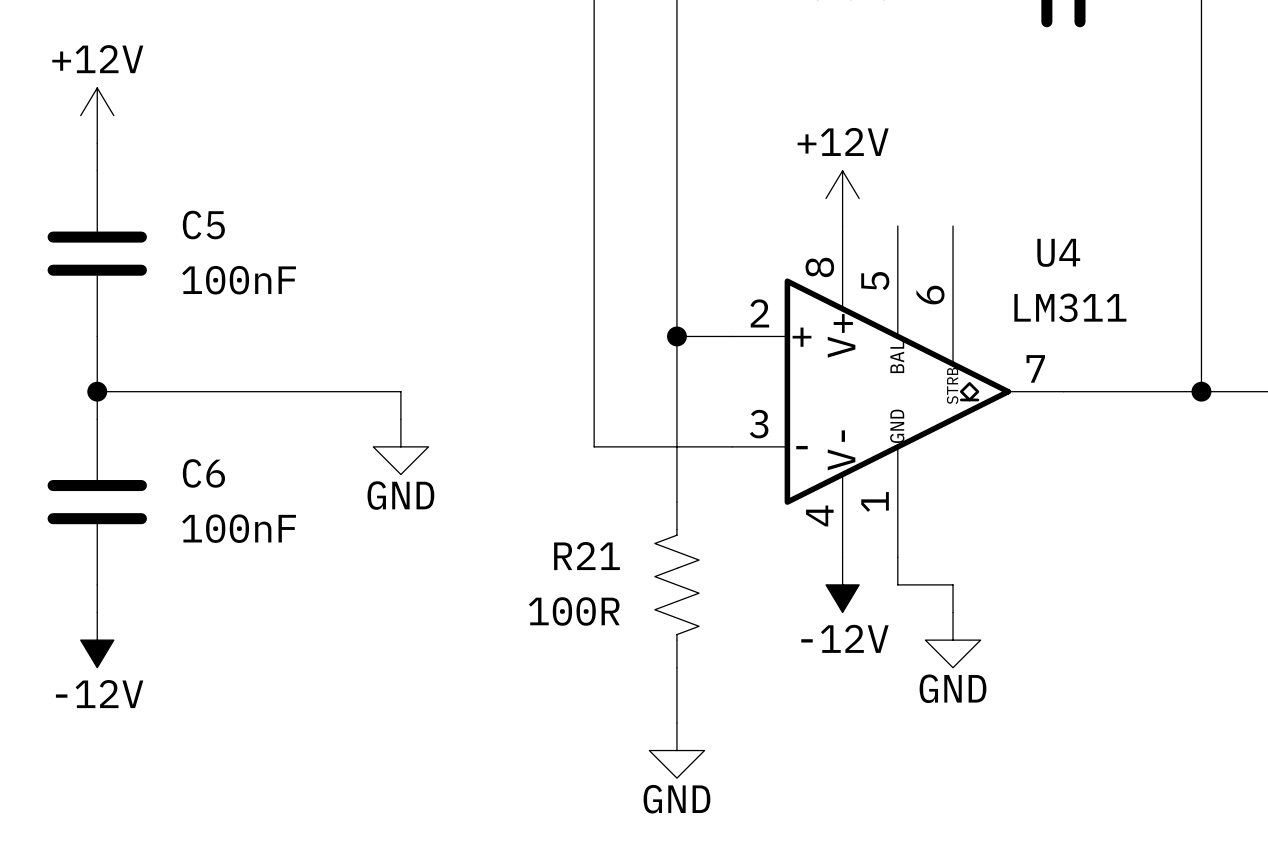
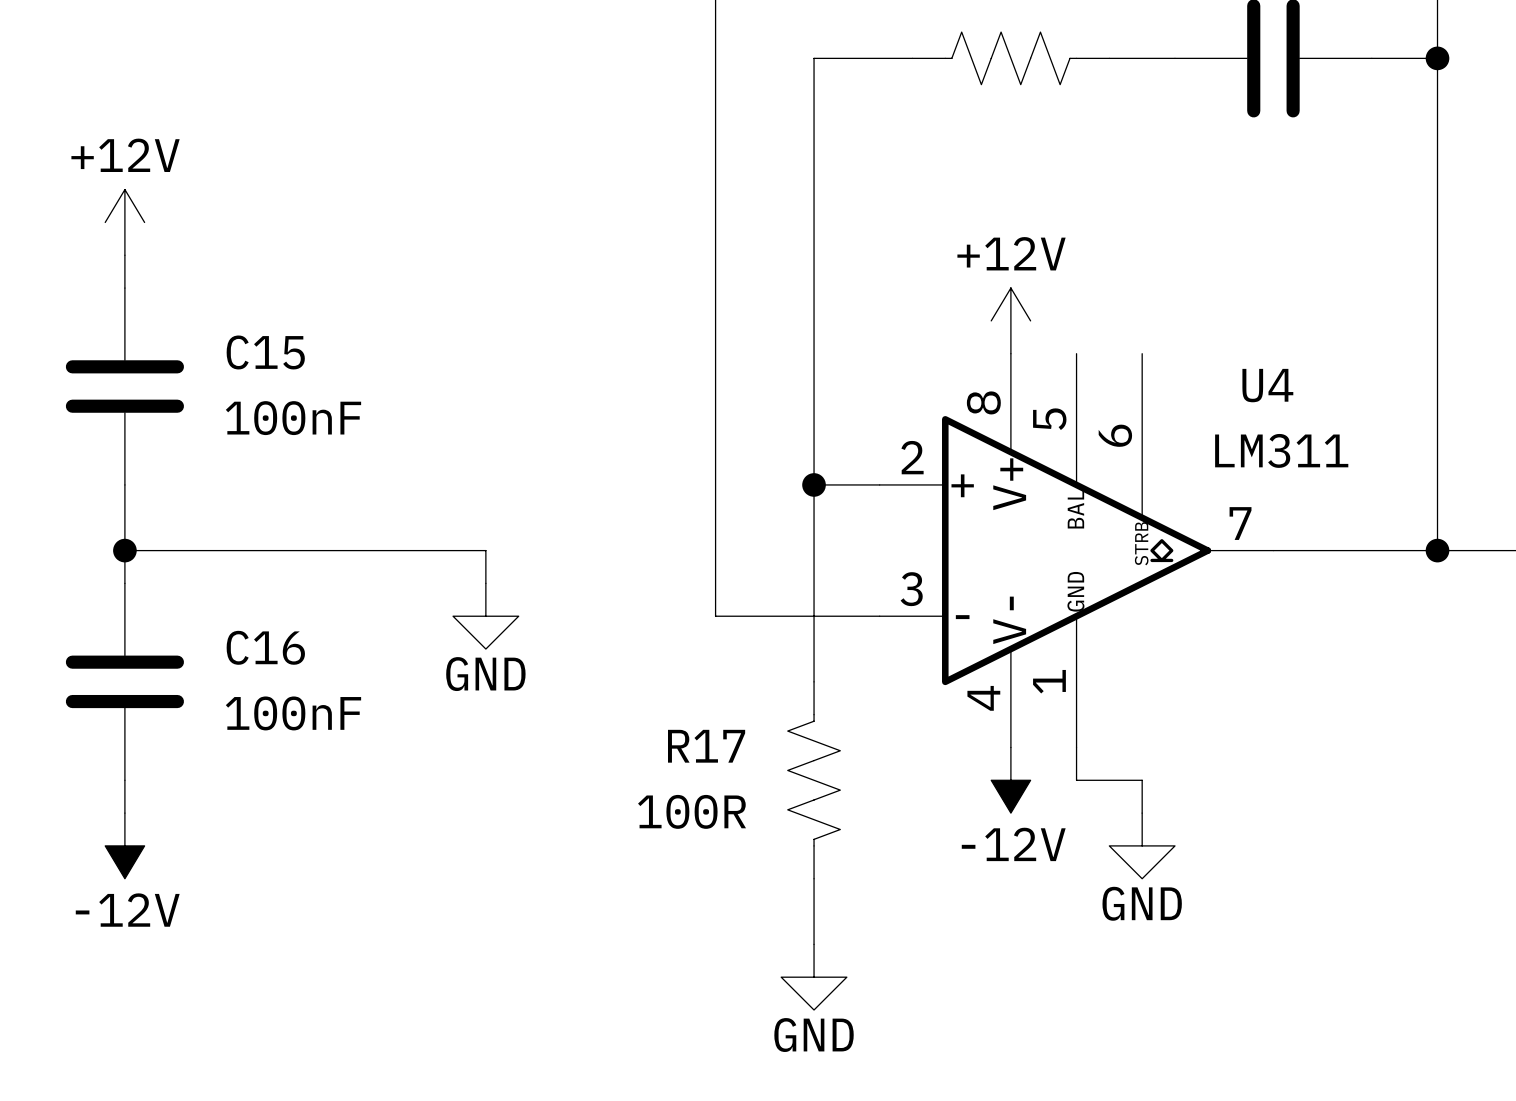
C5 name: C5 (203, 225) -> C15 (265, 352)
C6 name: C6 (203, 473) -> C16 (265, 647)
R21 name: R21 (587, 556) -> R17 (706, 746)

